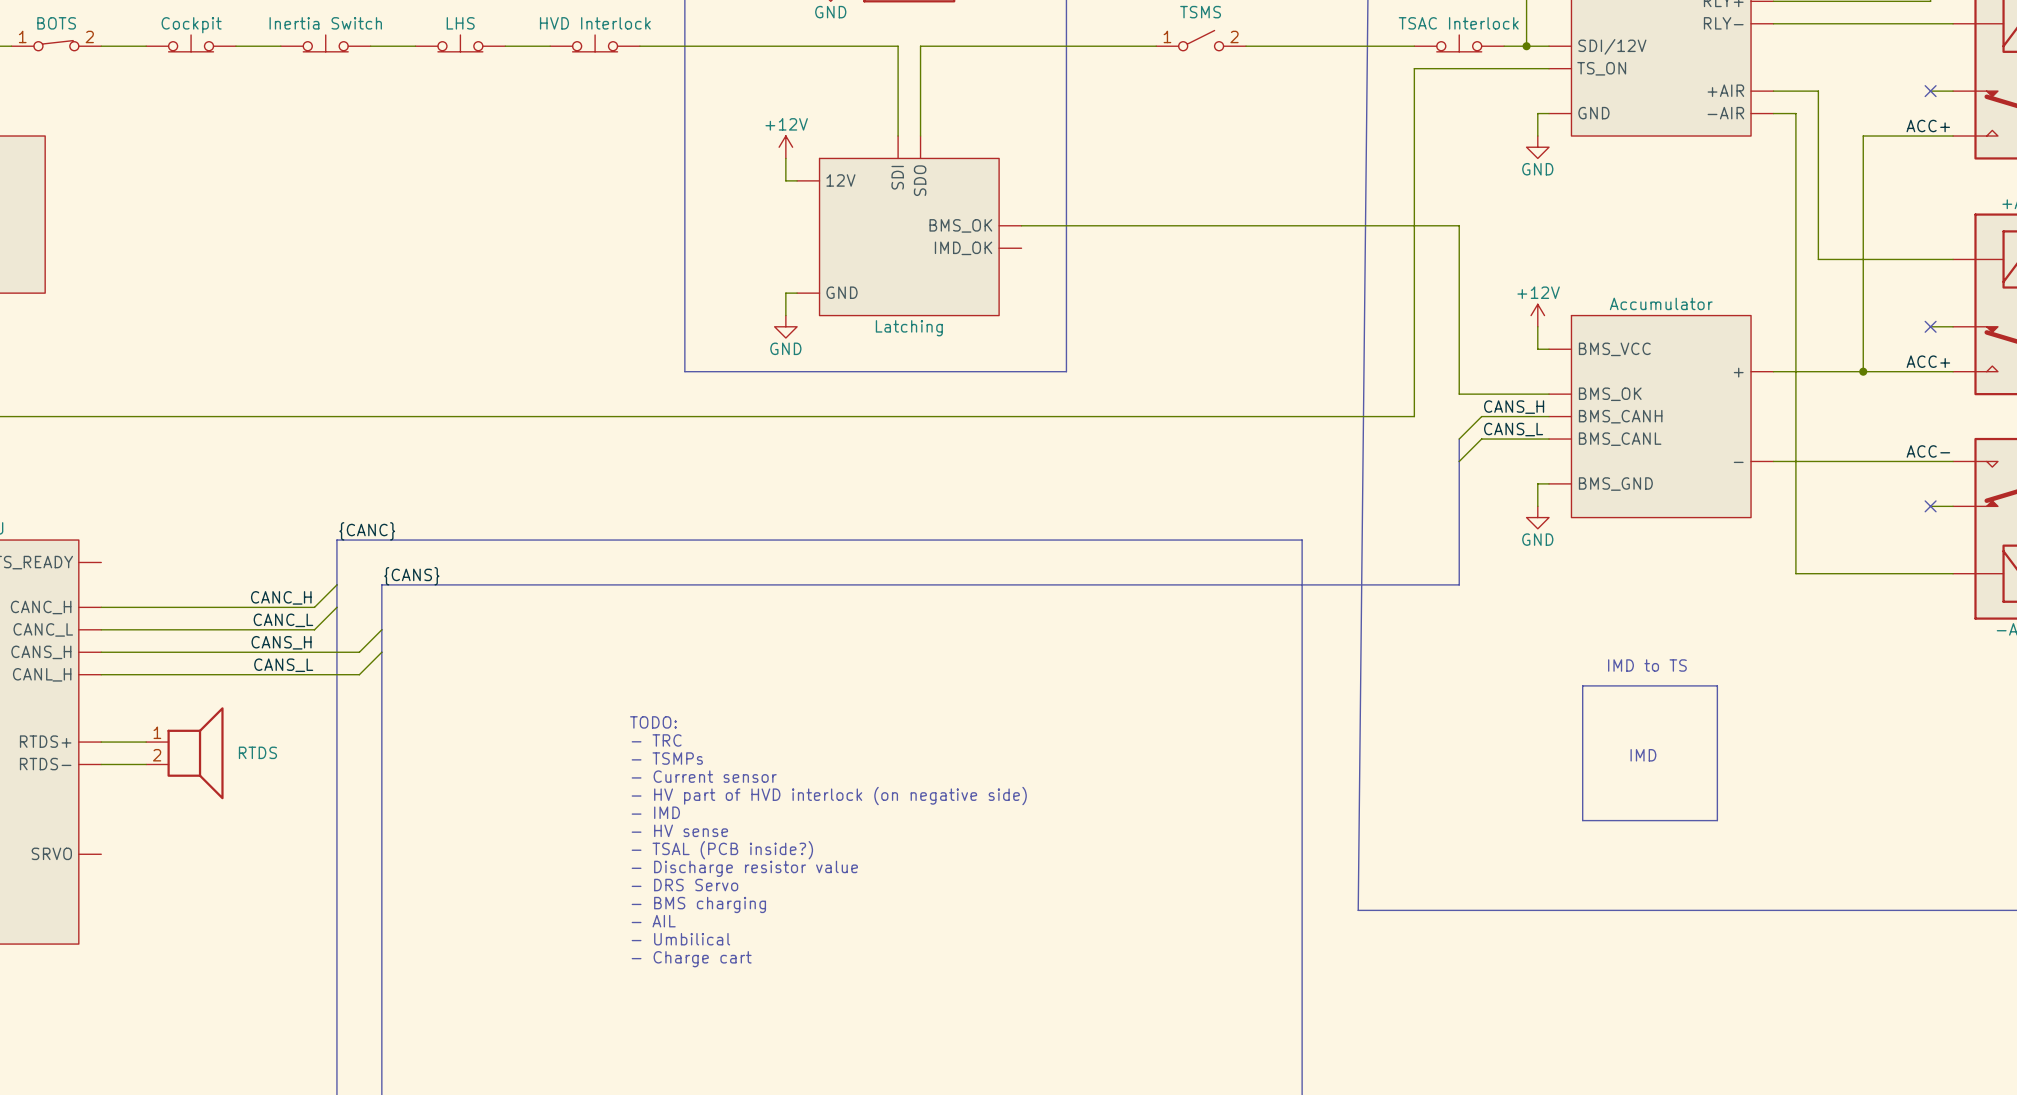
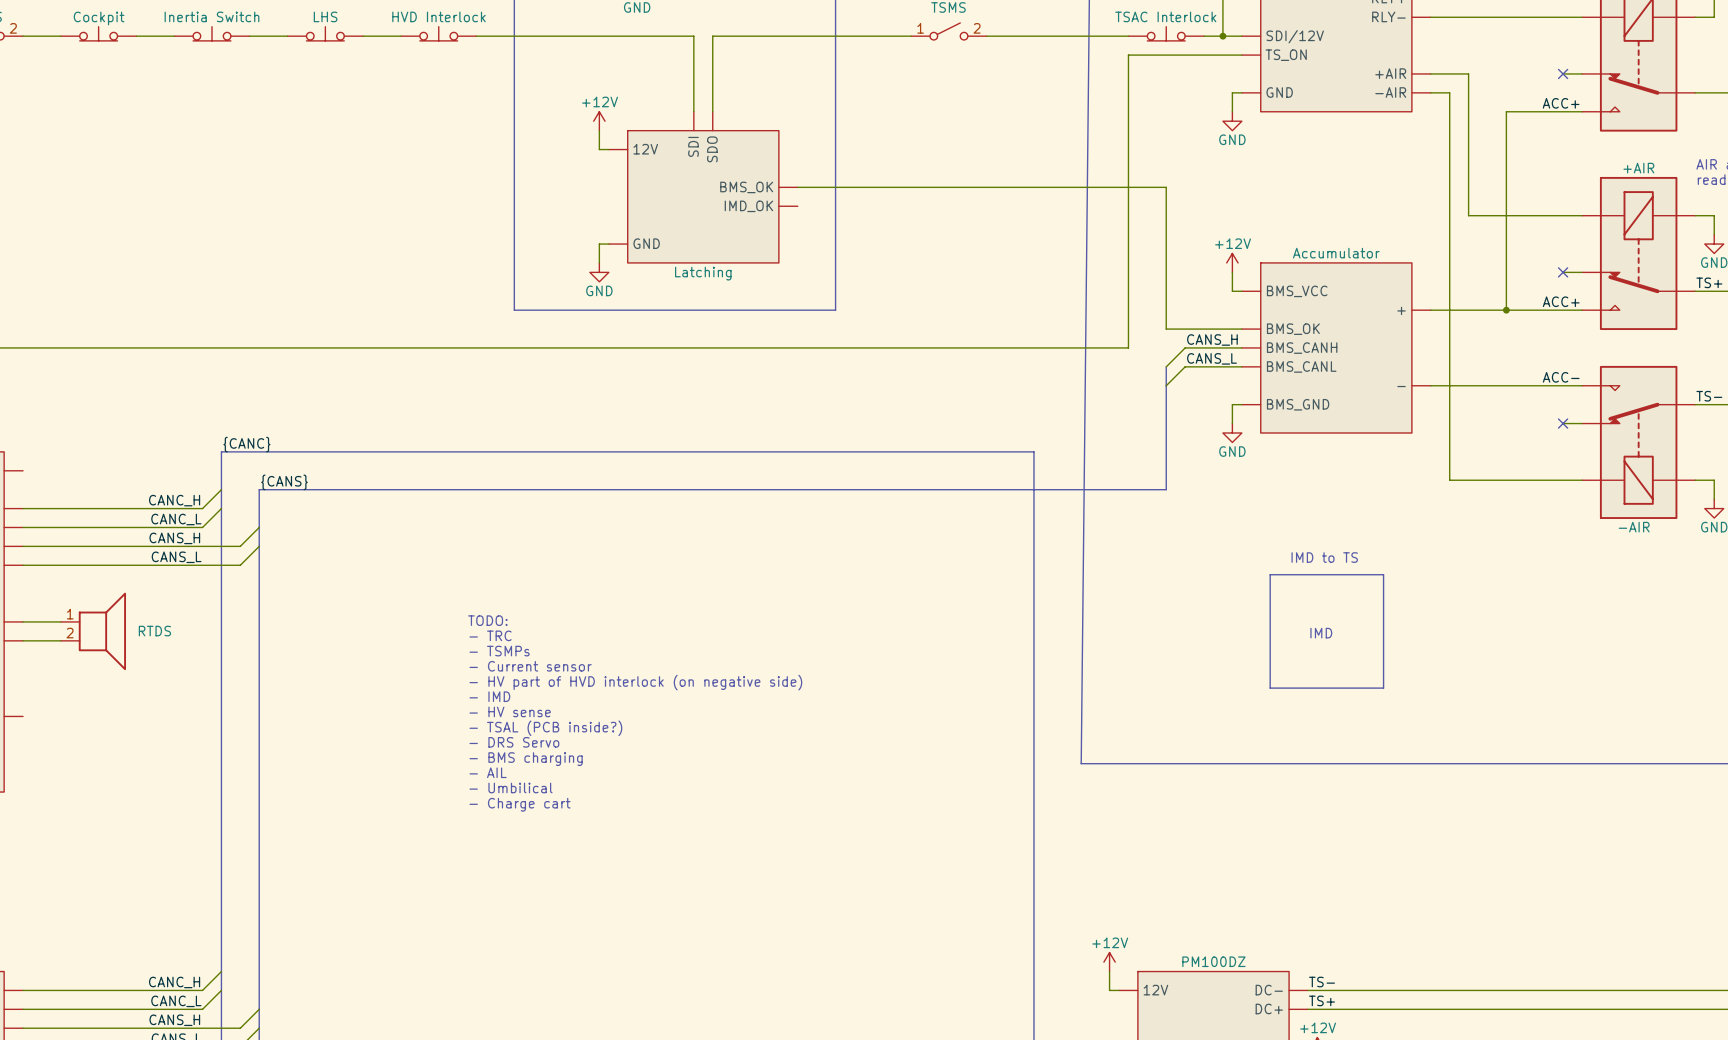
text: TODO: (653, 722) -> none
text: - TRC (656, 740) -> TODO: (487, 620)
text: - TSMPs (667, 758) -> - TRC (490, 635)
text: - Current sensor (704, 776) -> - TSMPs (499, 651)
text: - HV part of HVD interlock (on negative side) (829, 796) -> - Current sensor (530, 666)
text: - IMD (655, 812) -> - HV part of HVD interlock (on negative side) (635, 682)
text: - HV sense (679, 830) -> - IMD (489, 696)
text: - TSAL (PCB inside?) (722, 850) -> - HV sense (510, 711)
text: - Discharge resistor value (744, 868) -> - TSAL (PCB inside?) (545, 728)

